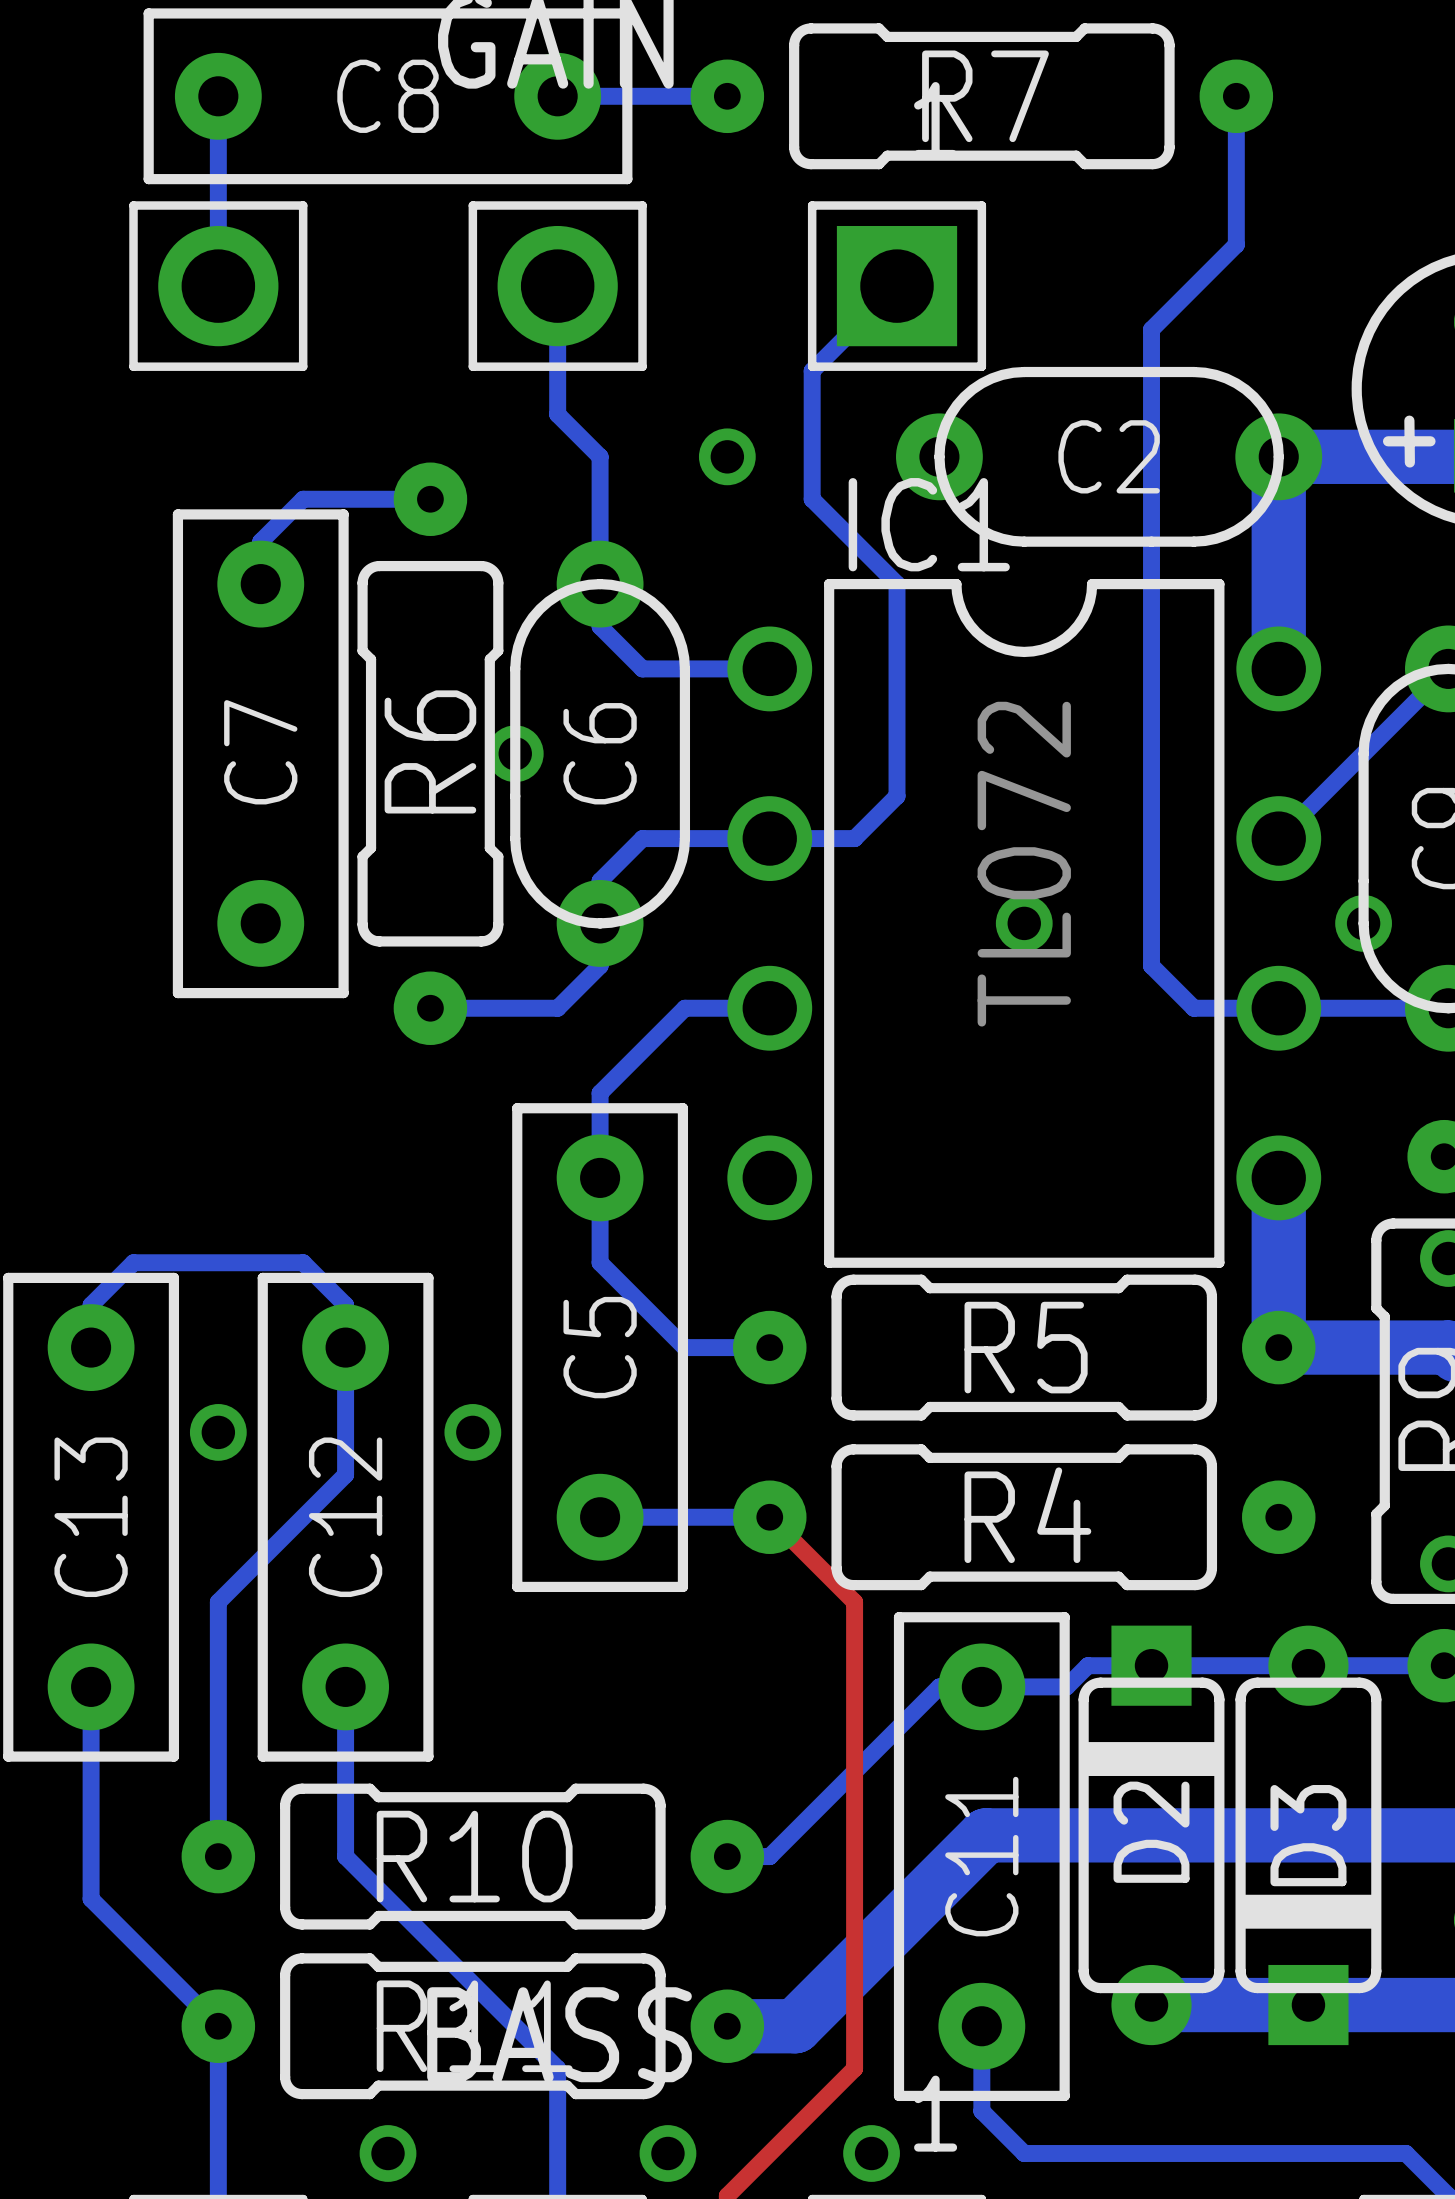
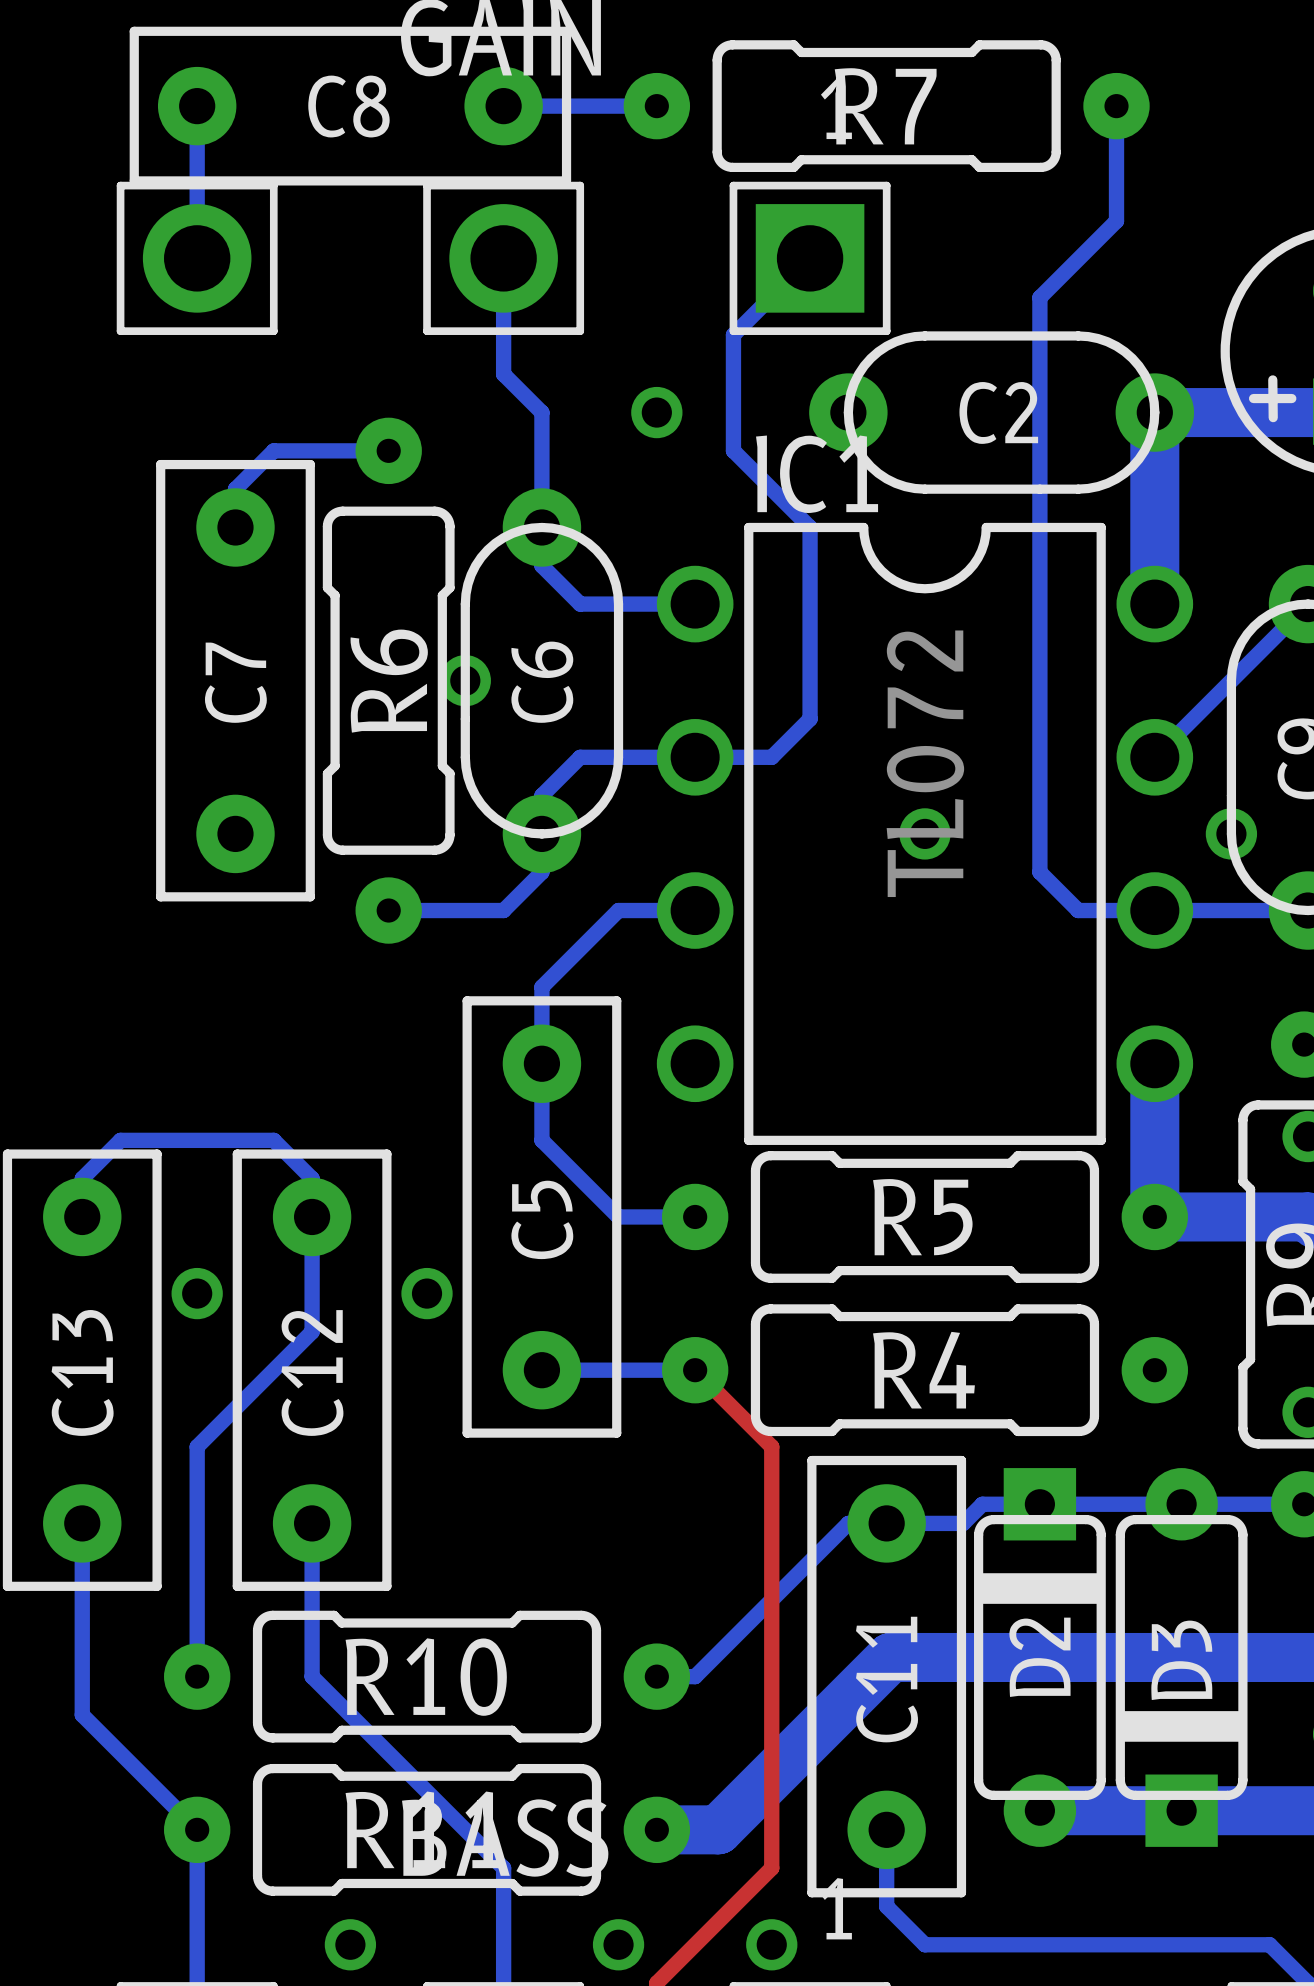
C8 position: (388, 96) -> (350, 106)
bottom track: (557, 96) (727, 96) -> (503, 106) (656, 106)
R7 position: (981, 96) -> (886, 106)
via position: (667, 2153) -> (618, 1944)
via position: (871, 2153) -> (771, 1944)

